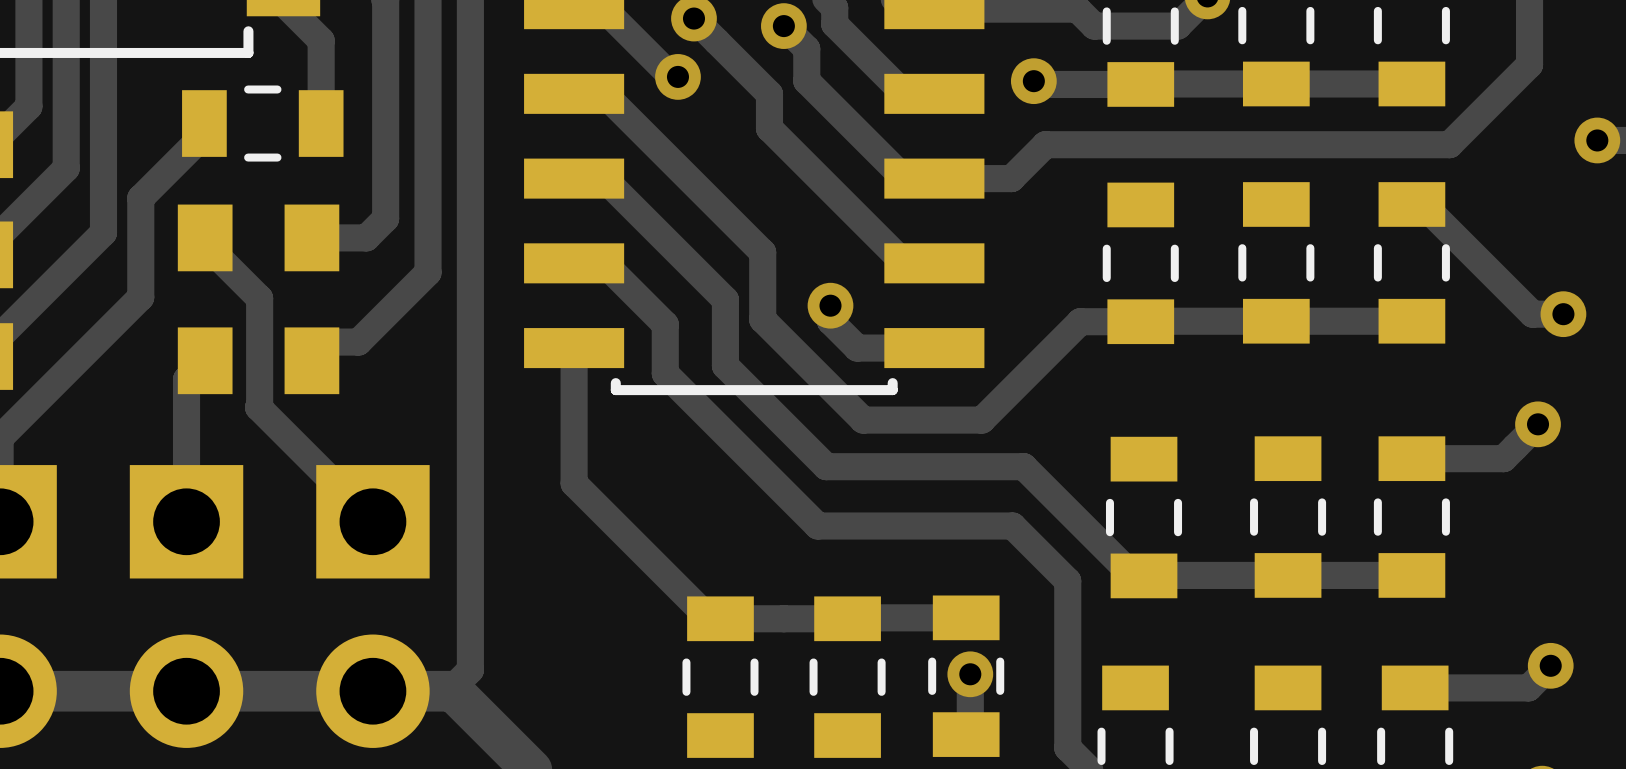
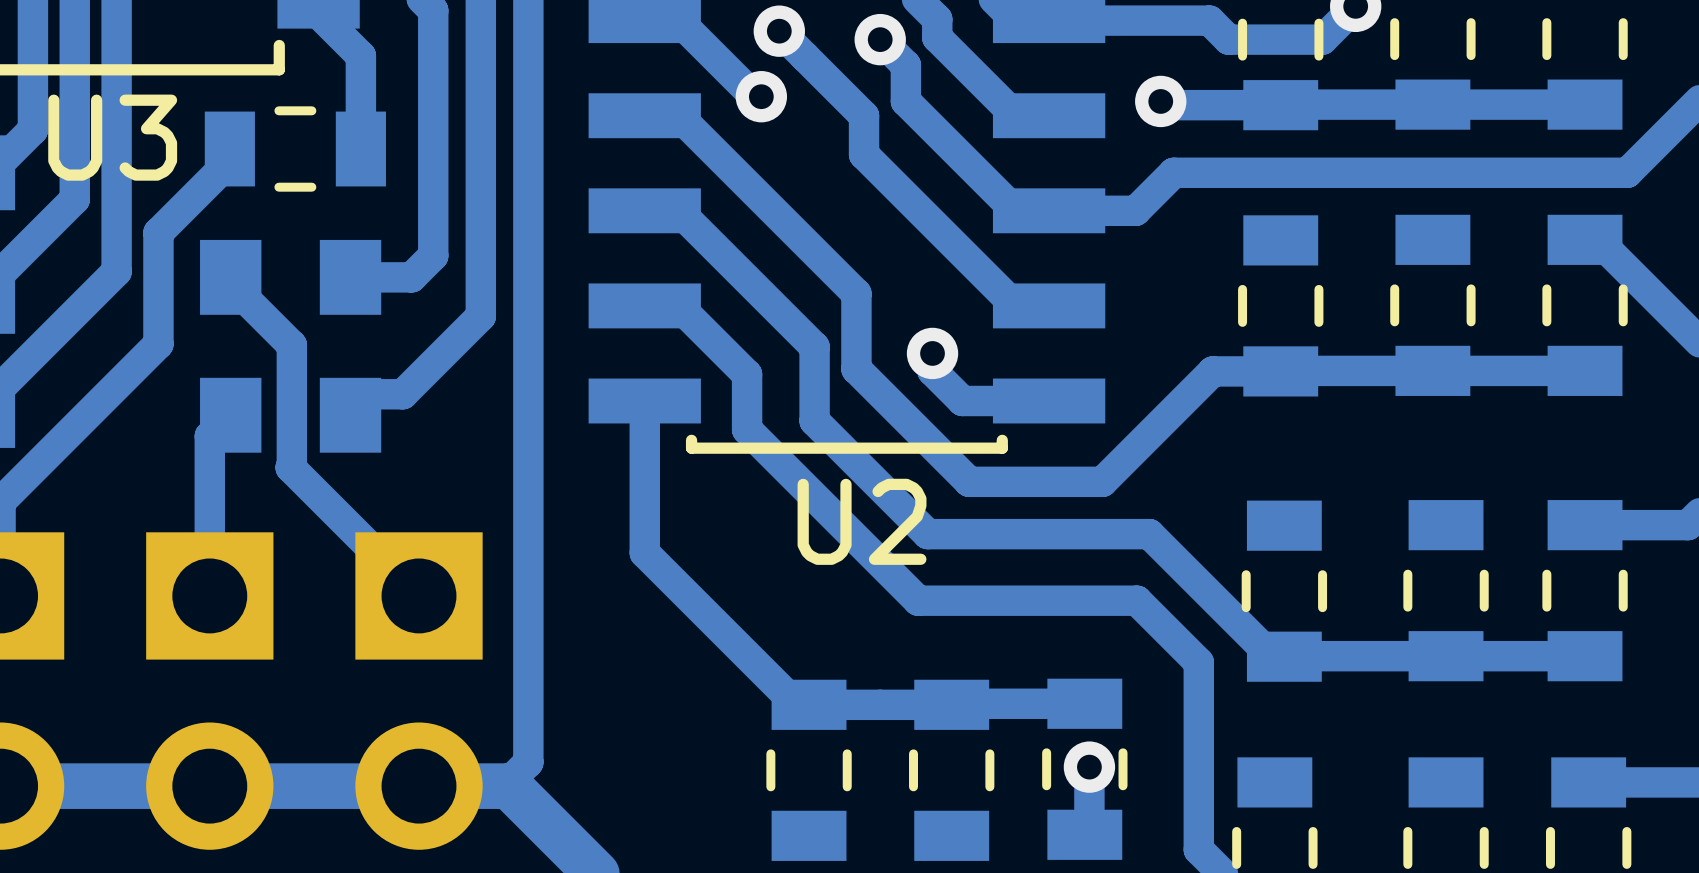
U3 name: none -> U3 (112, 137)
U2 name: none -> U2 (862, 521)

